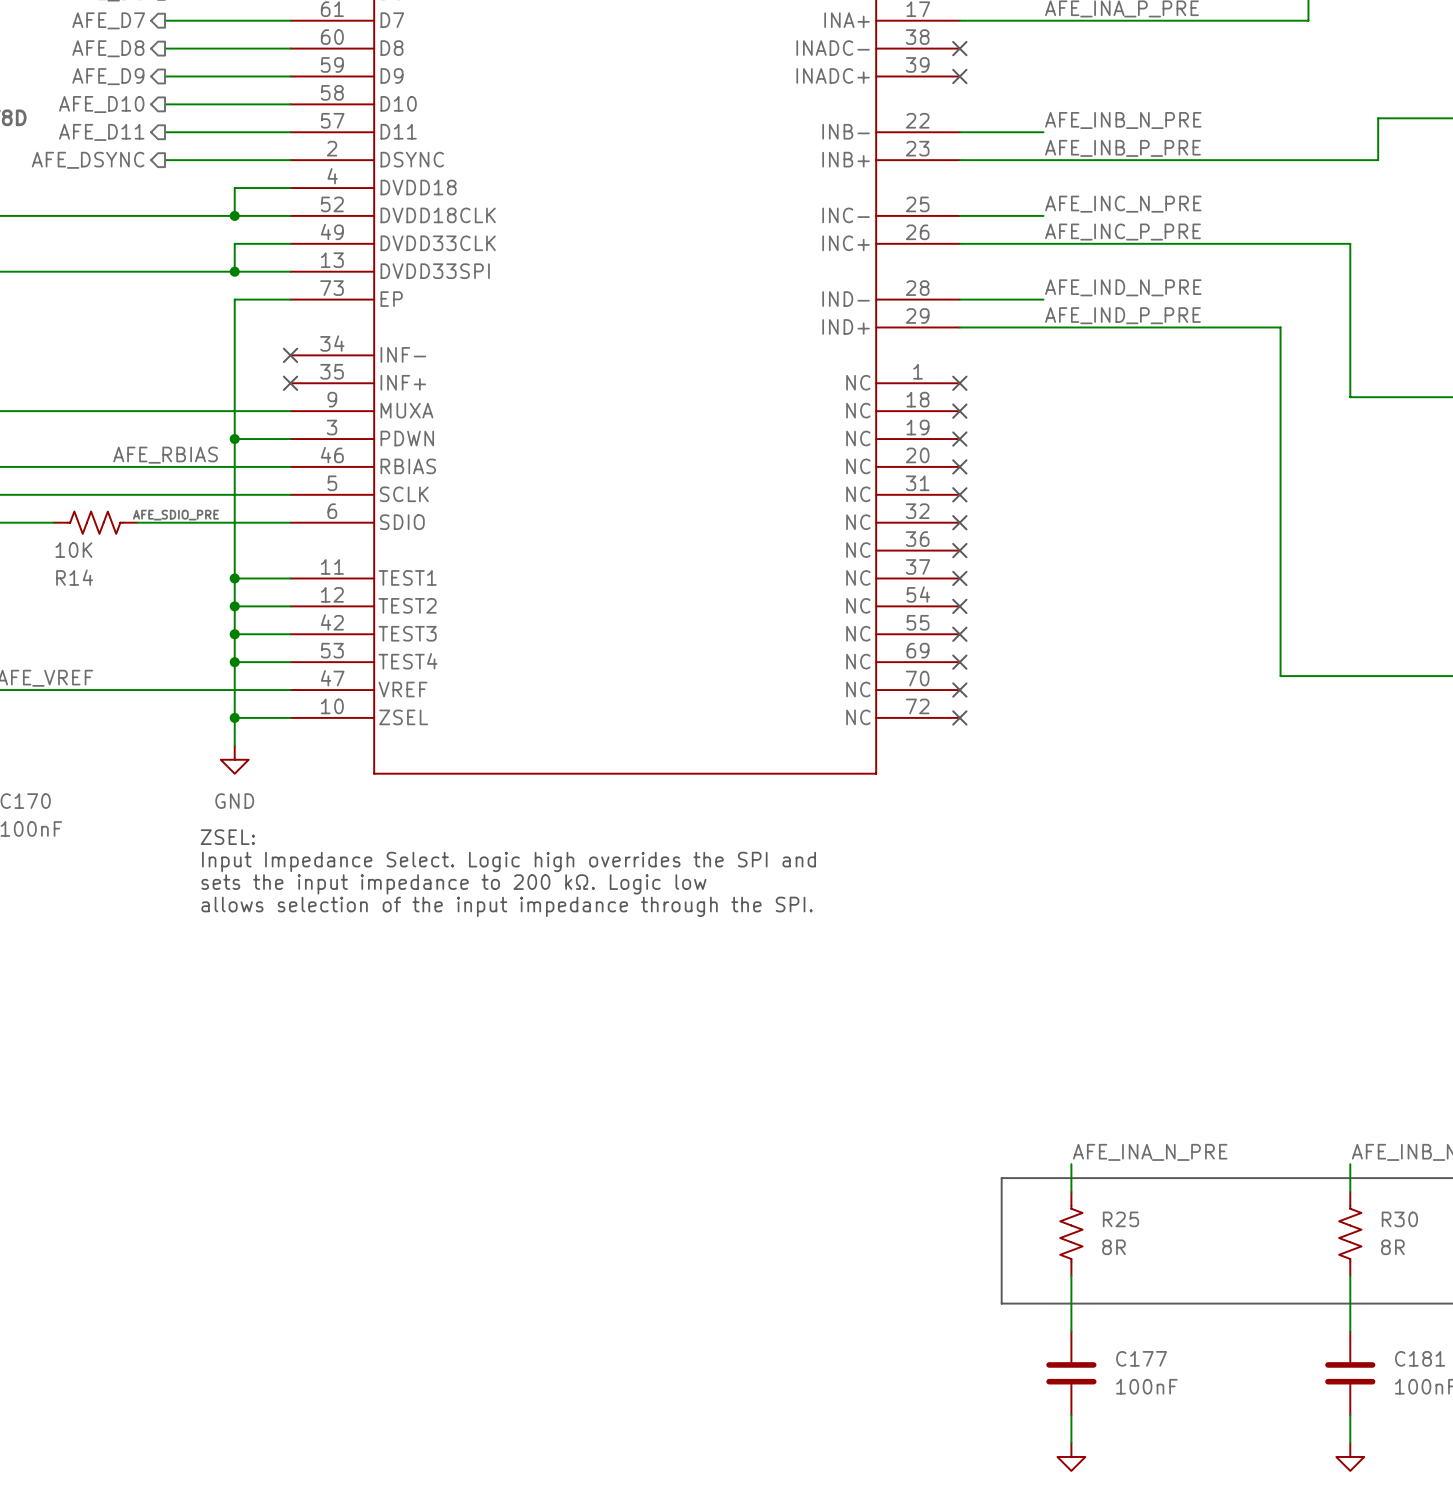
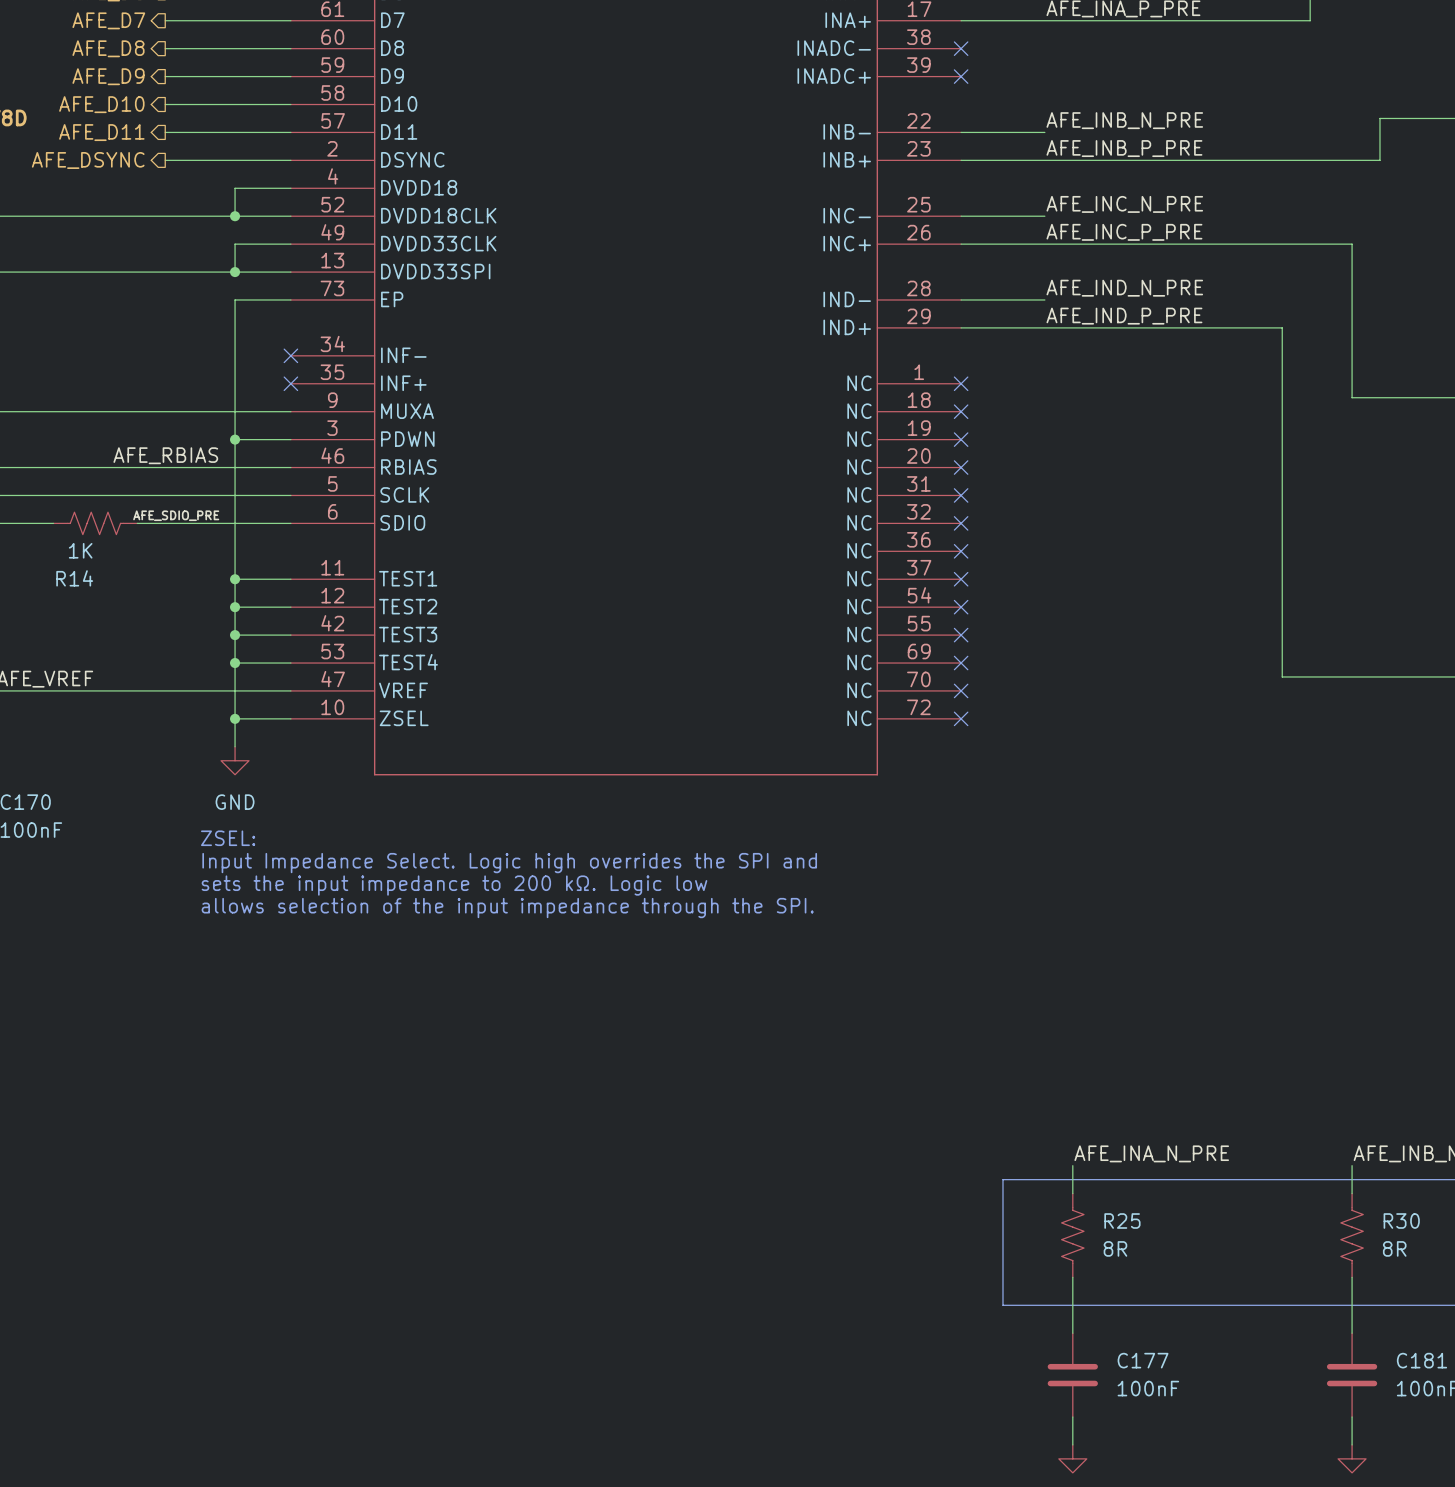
R14 value: 10K (73, 550) -> 1K (80, 550)

